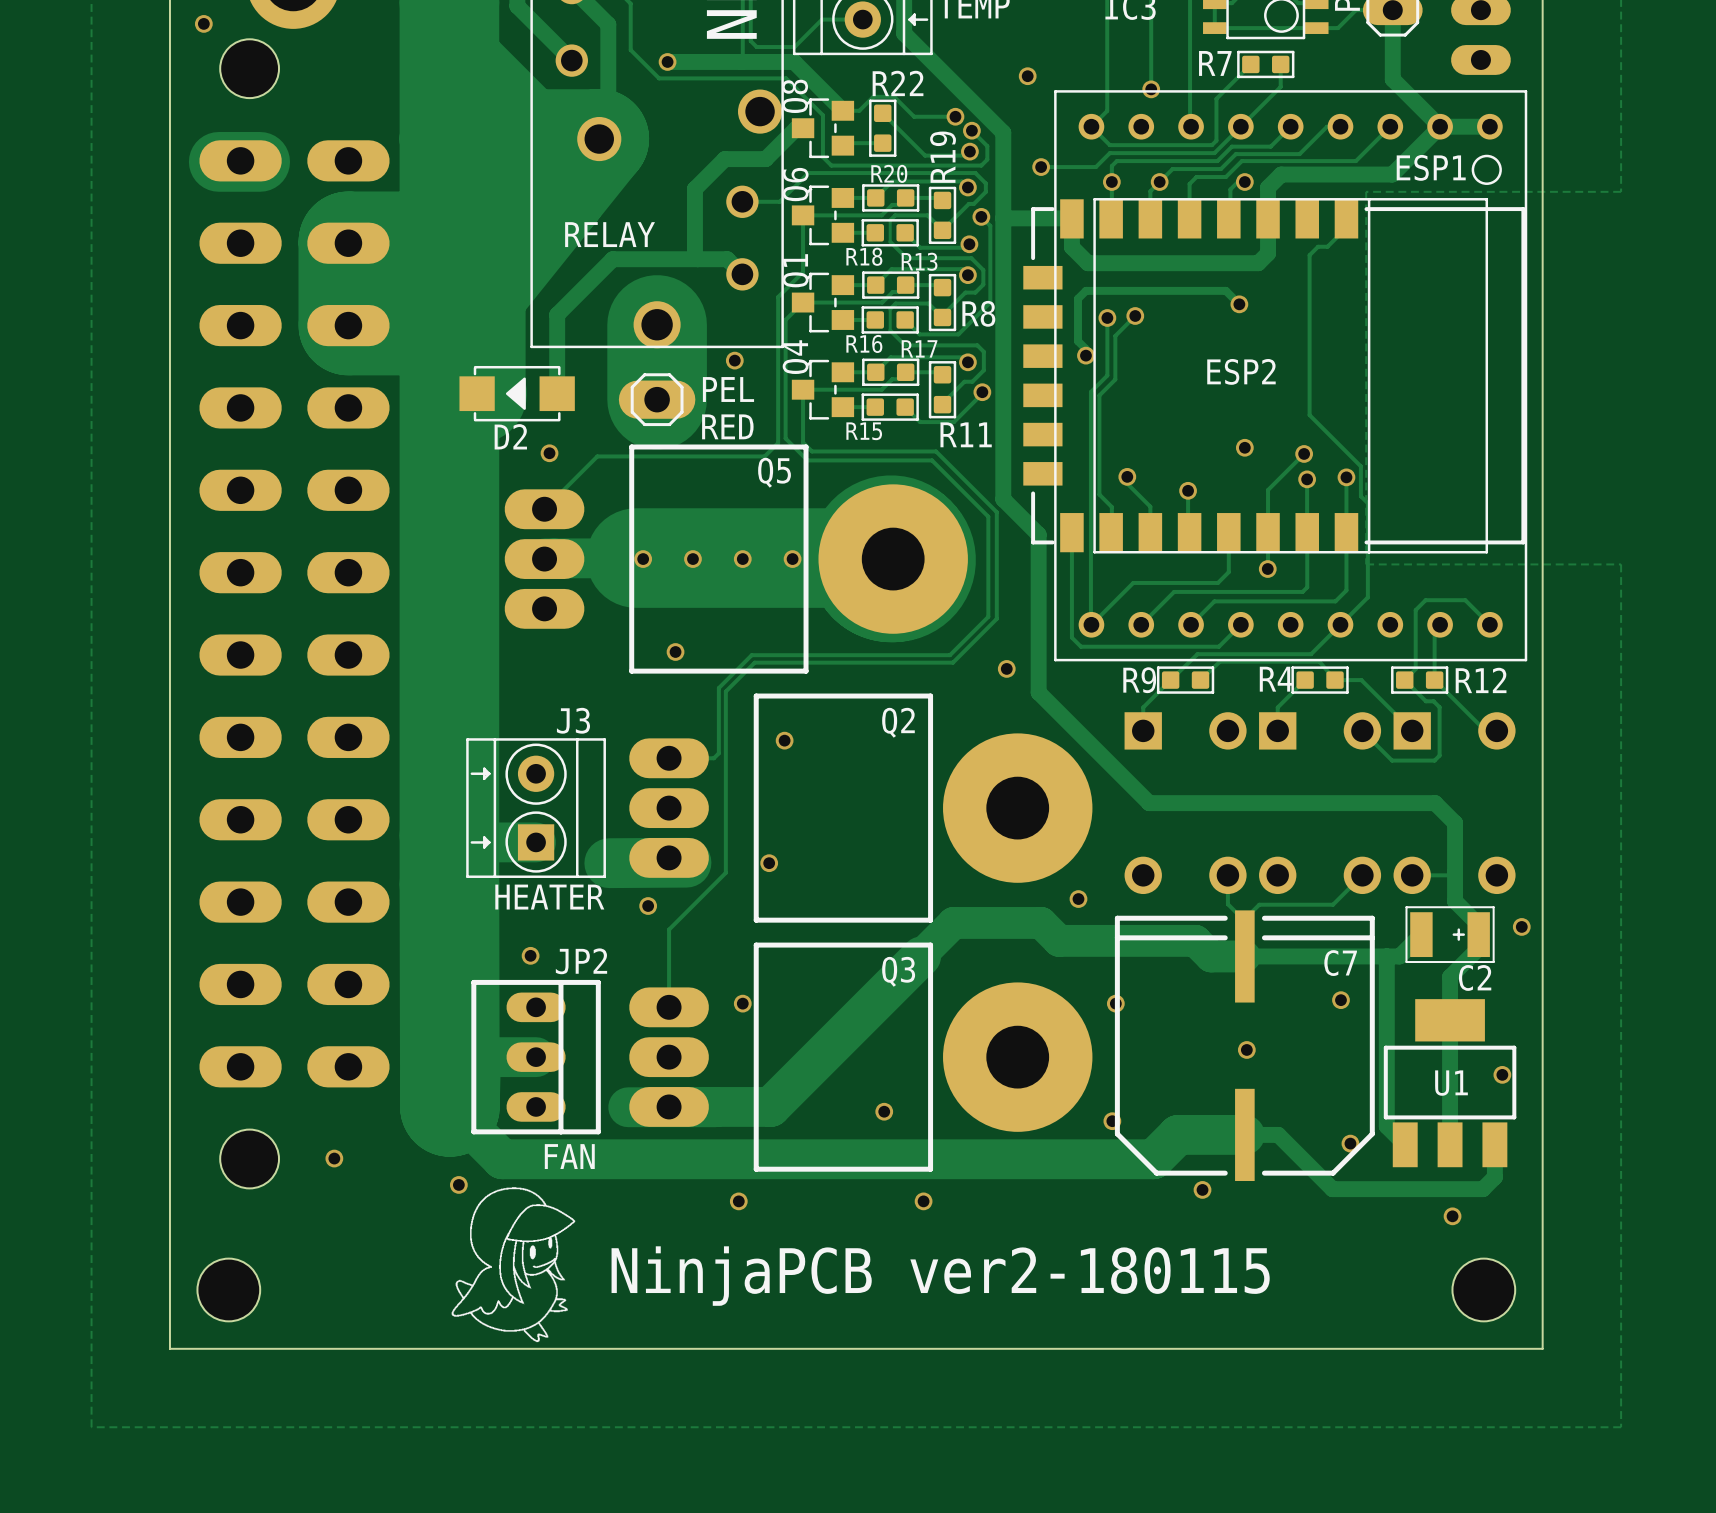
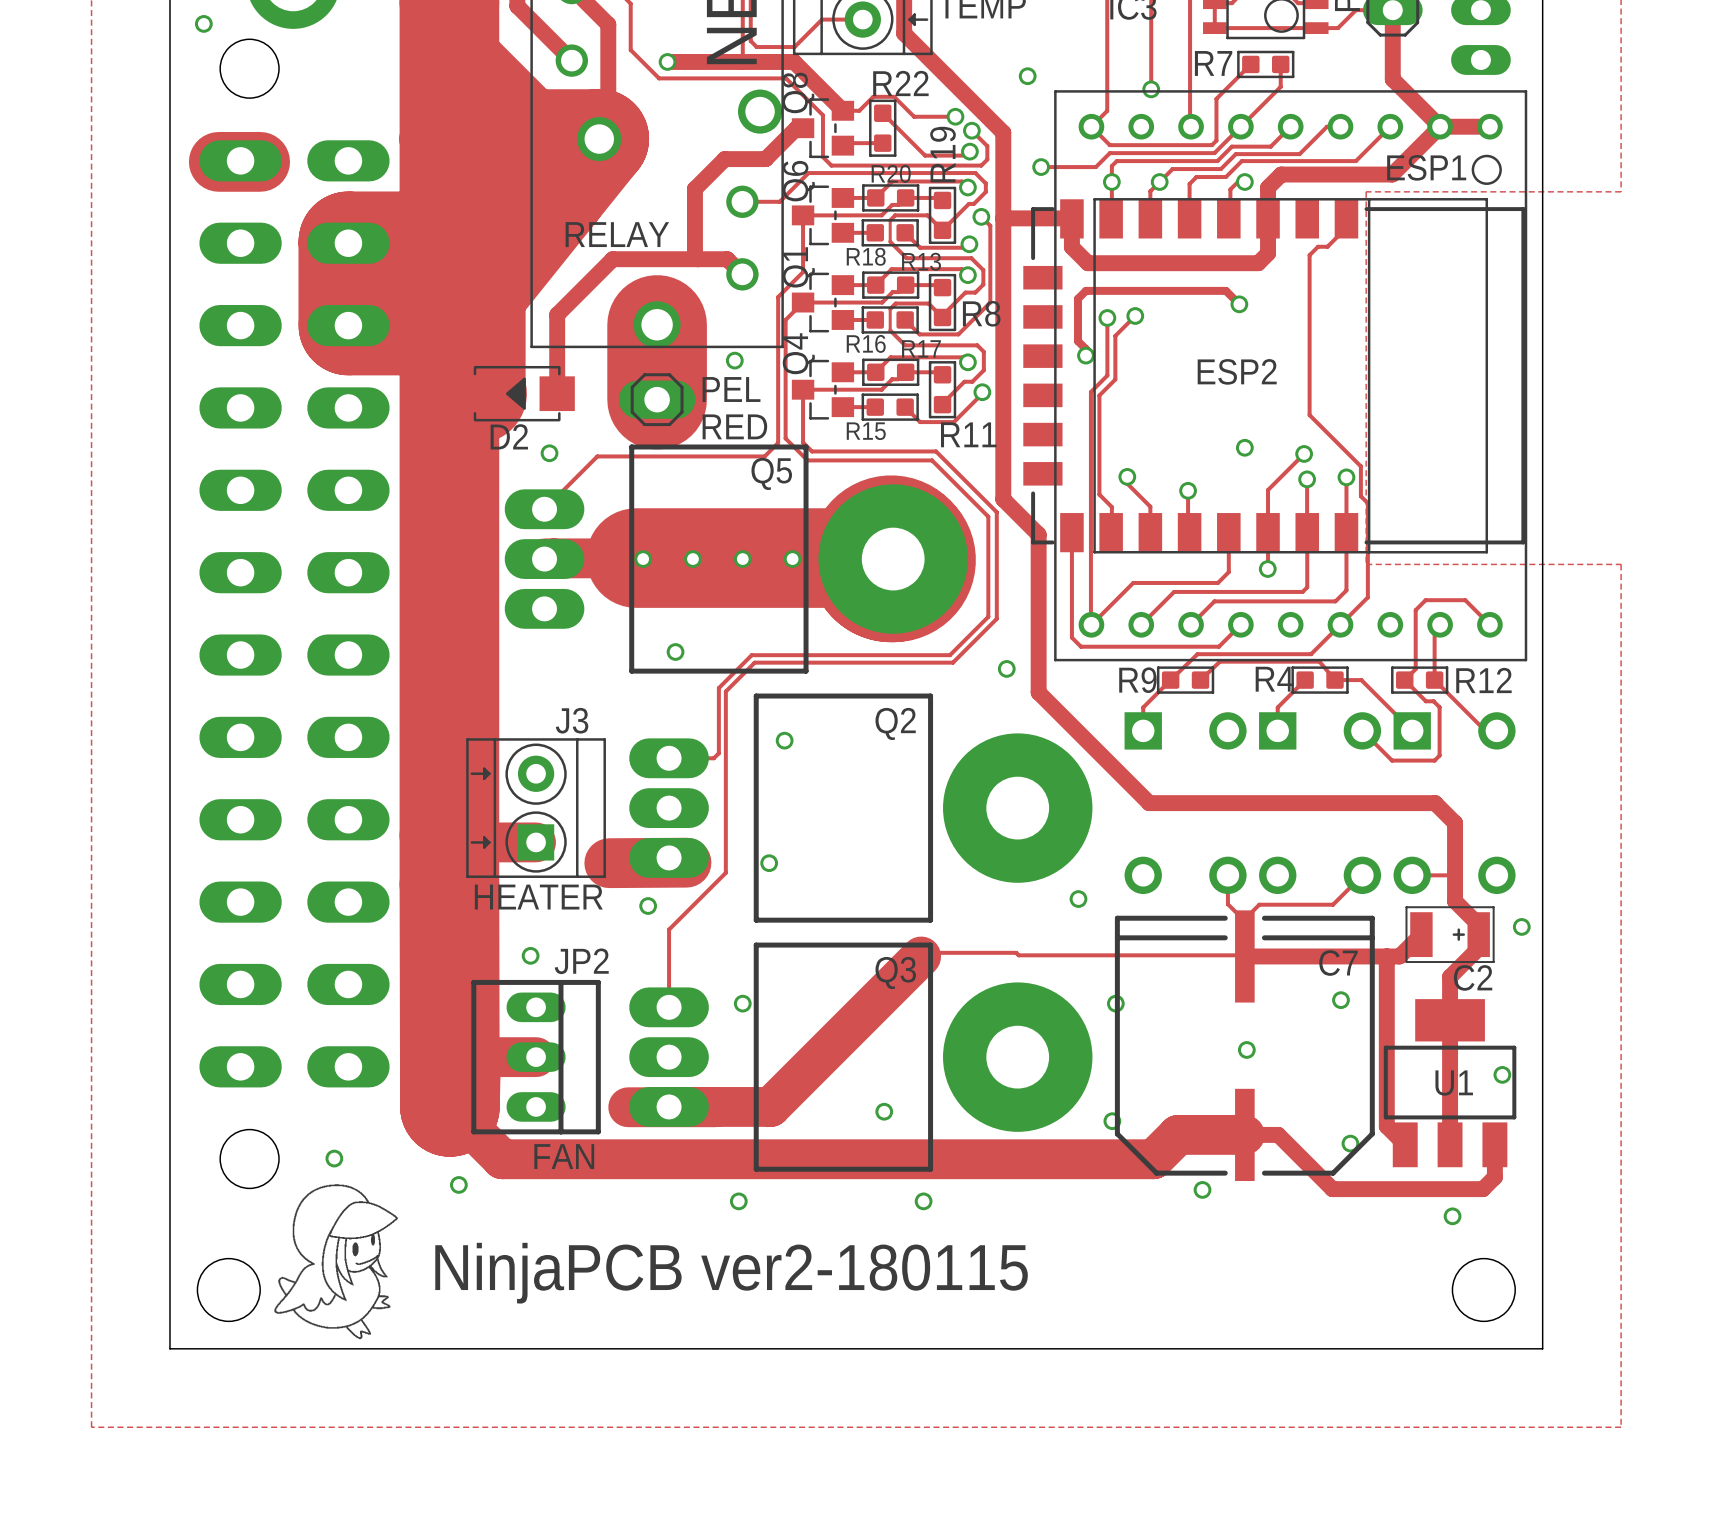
track: none -> (924, 952) (1016, 952) (1018, 955) (1238, 955)
track: (921, 956) (953, 922) (1041, 922) (1059, 940) (1195, 940) (1211, 956) (1244, 956) -> none
drawing position: (513, 1264) -> (336, 1261)
text position: NinjaPCB ver2-180115 (940, 1276) -> NinjaPCB ver2-180115 (731, 1273)

